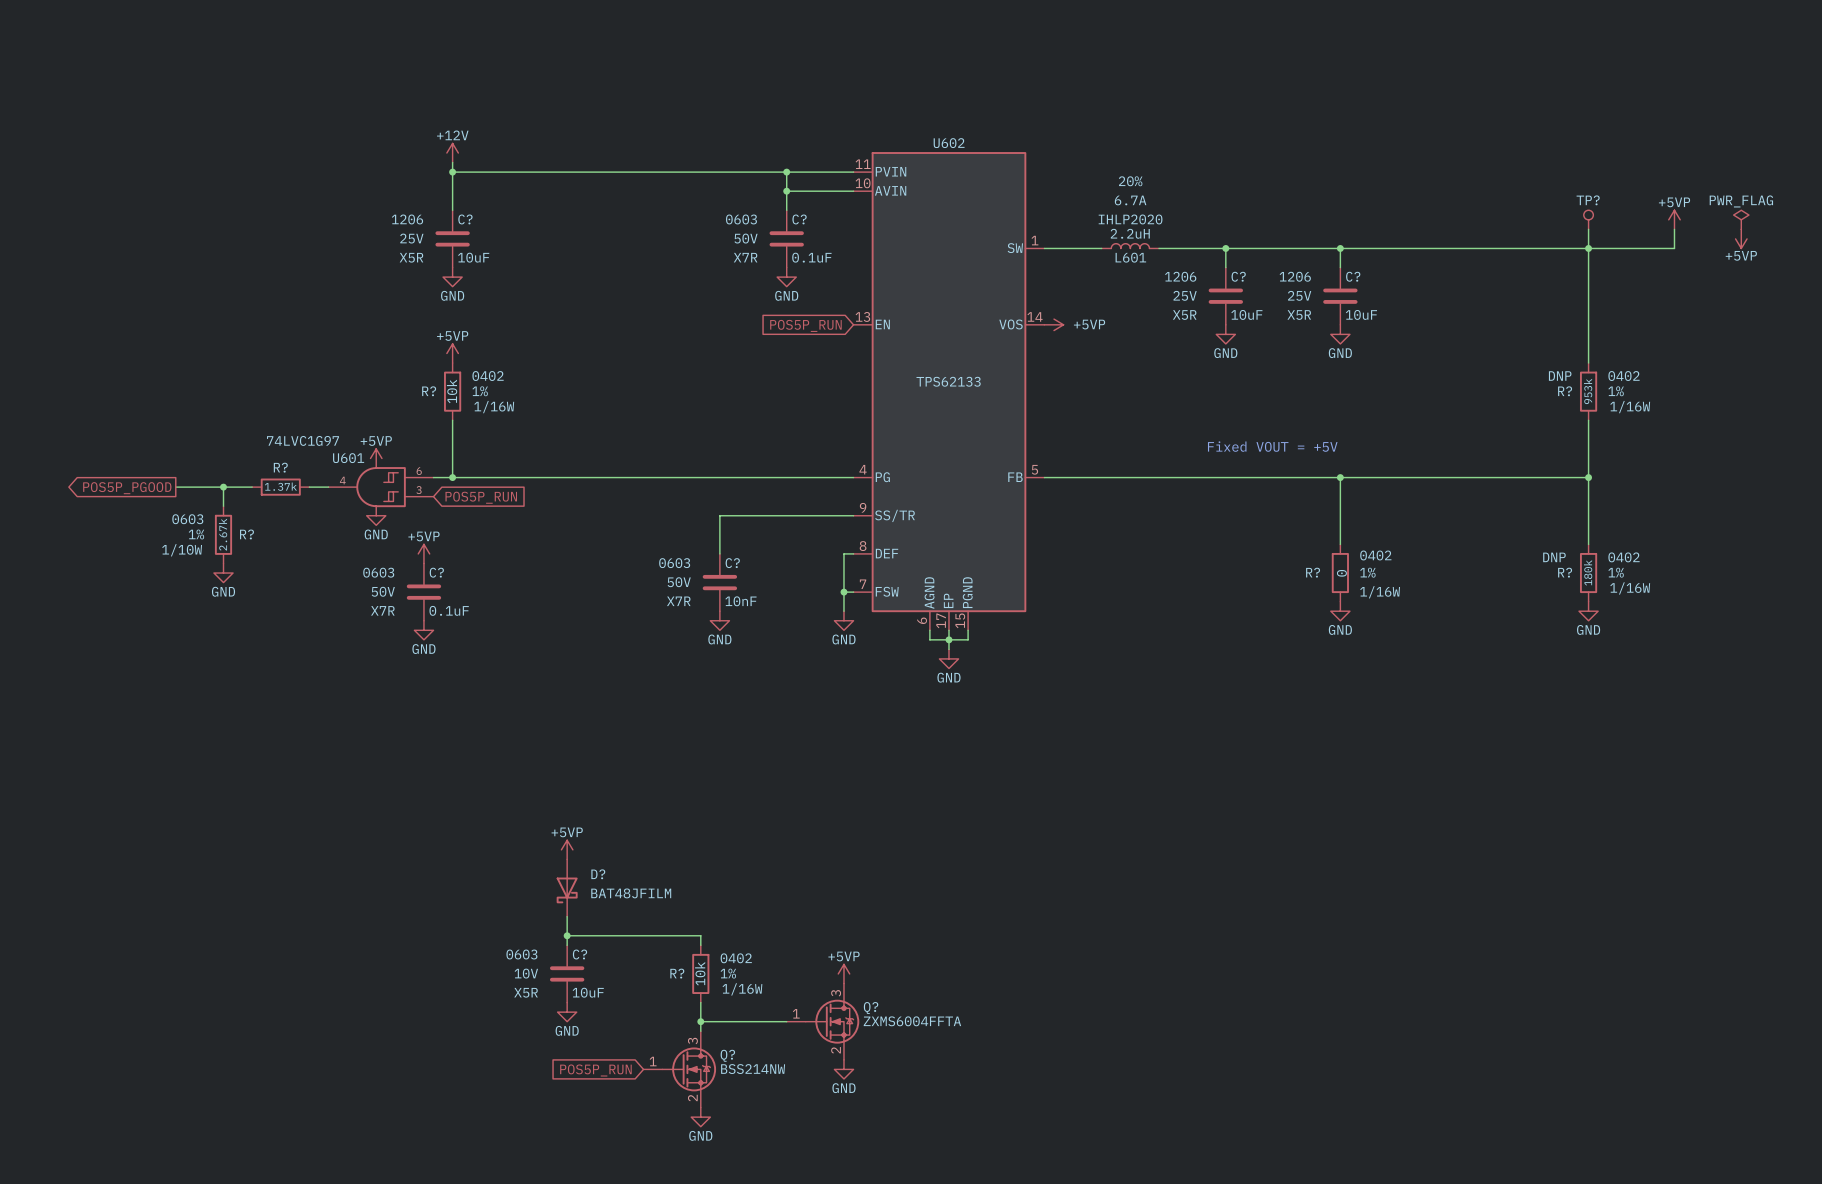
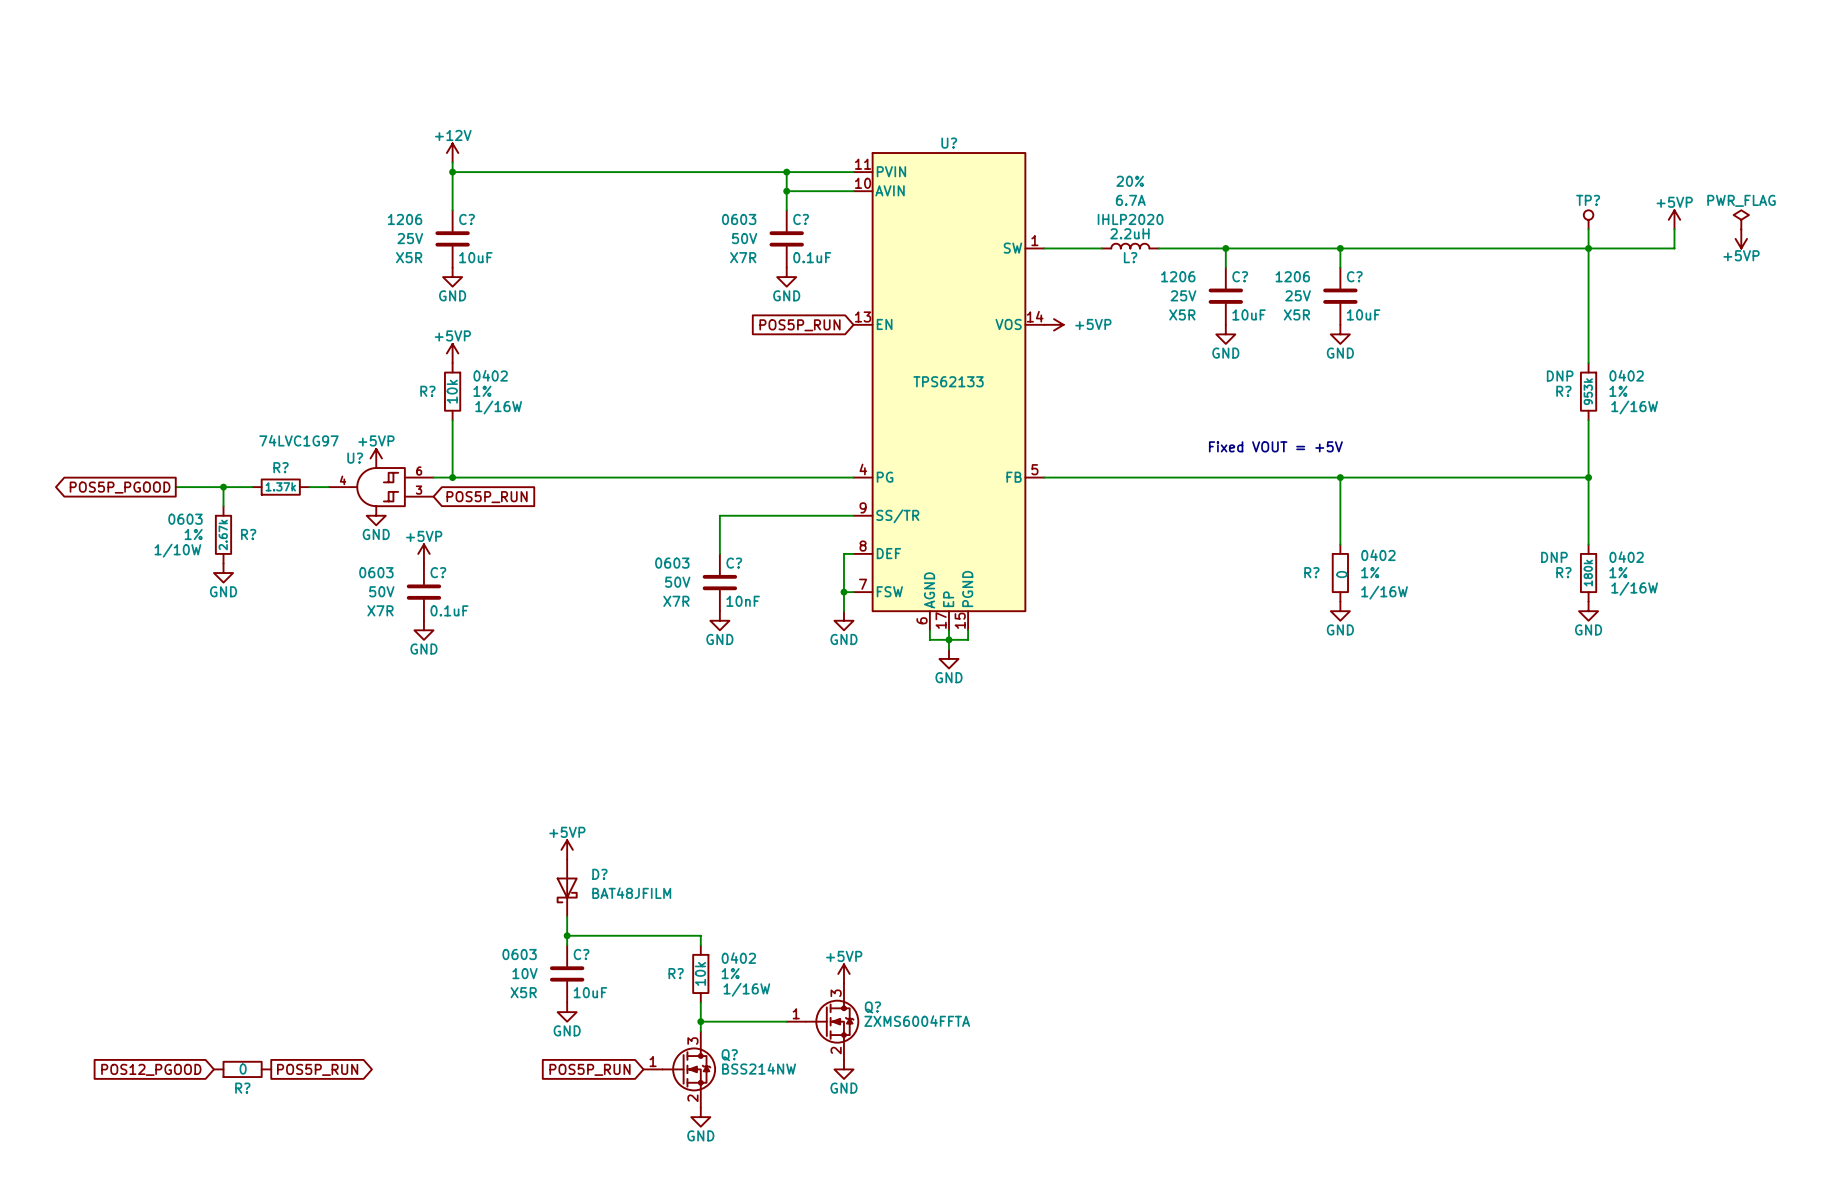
U602 name: U602 (949, 143) -> U? (949, 143)
L601 name: L601 (1130, 257) -> L? (1130, 257)
U601 name: U601 (348, 458) -> U? (355, 458)
R?: none -> 0 (242, 1069)
global label: none -> POS12_PGOOD (151, 1069)
global label: none -> POS5P_RUN (317, 1069)

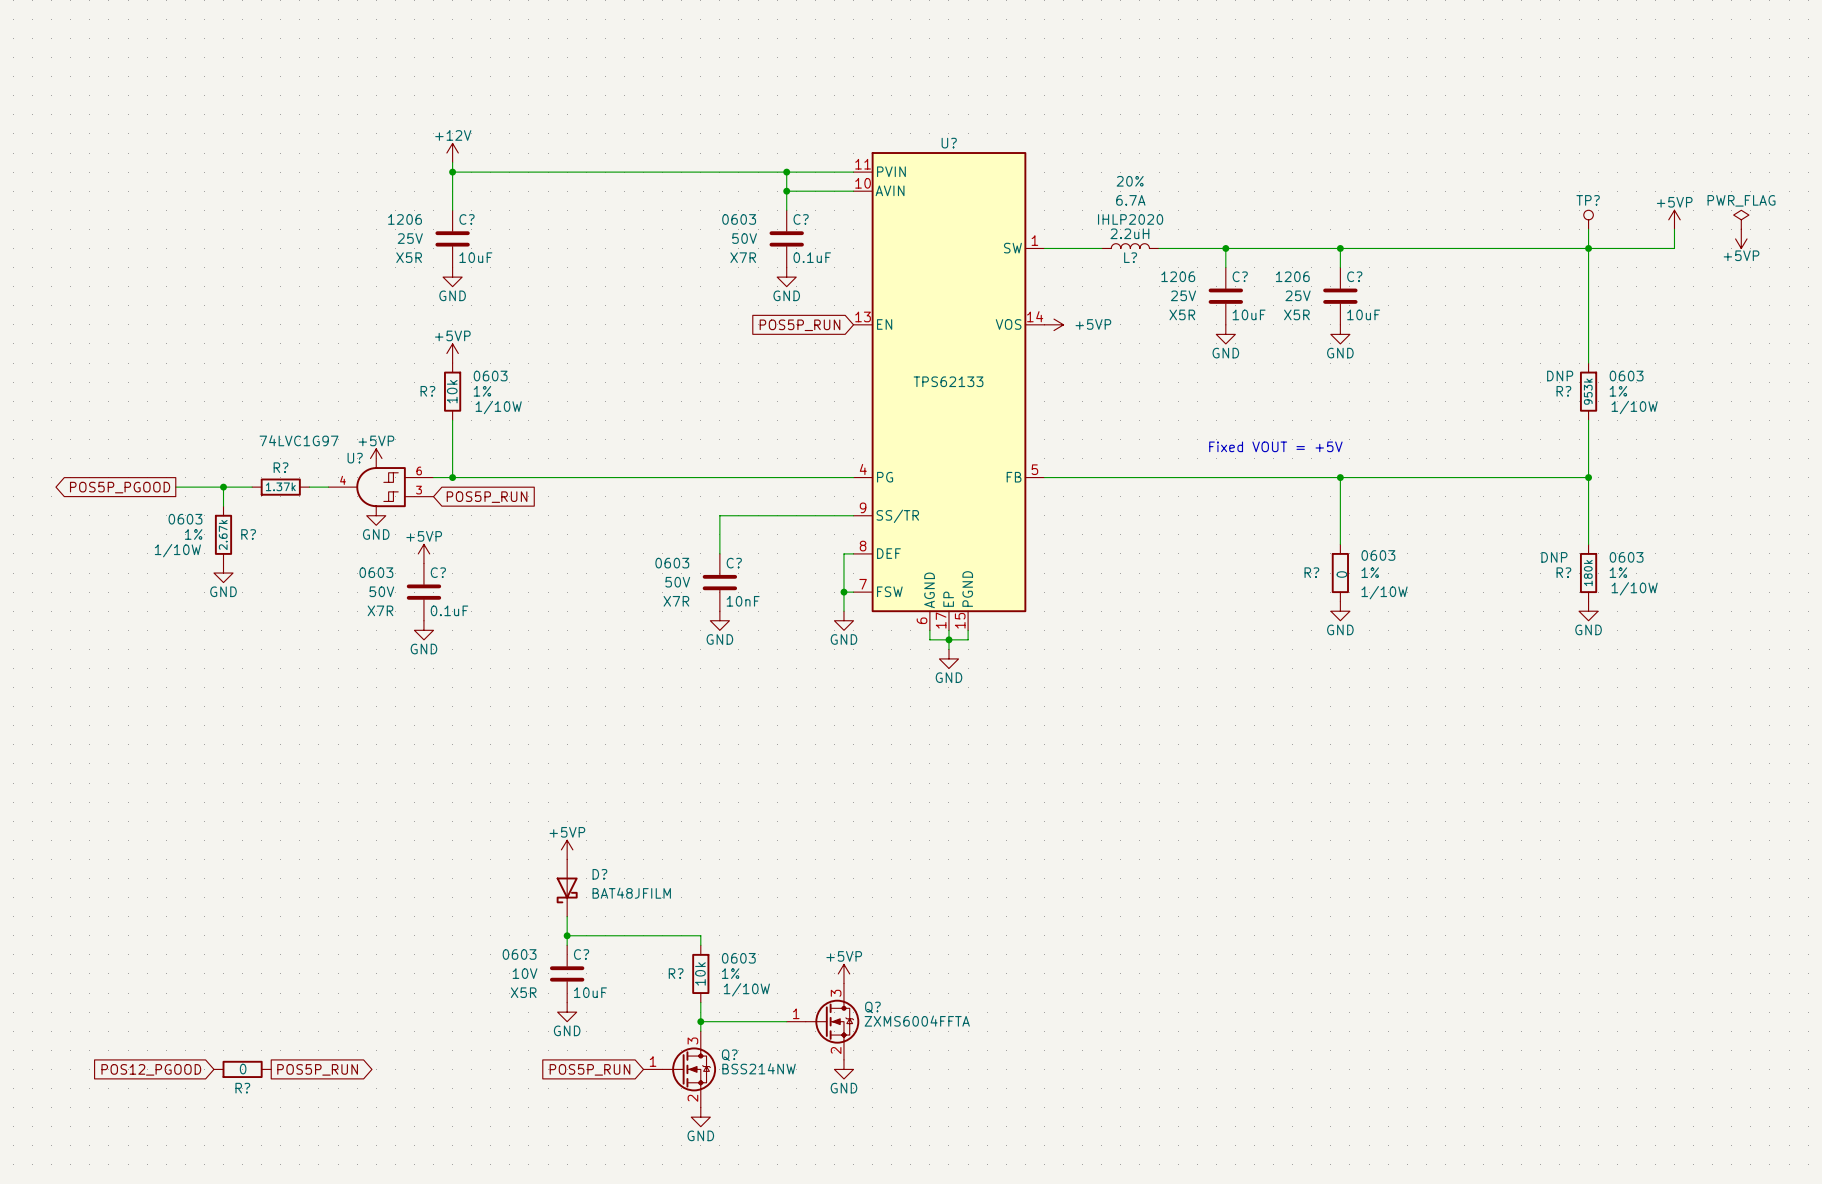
R? text: 0402 (490, 375) -> 0603 (490, 376)
R? text: 0402 (1626, 375) -> 0603 (1626, 376)
R? text: 1/16W (498, 407) -> 1/10W (498, 407)
R? text: 1/16W (1634, 407) -> 1/10W (1634, 407)
R? text: 0402 (1378, 555) -> 0603 (1378, 555)
R? text: 0402 (1626, 557) -> 0603 (1626, 557)
R? text: 1/16W (1634, 588) -> 1/10W (1634, 588)
R? text: 1/16W (1384, 592) -> 1/10W (1384, 592)
R? text: 0402 (738, 958) -> 0603 (738, 958)
R? text: 1/16W (746, 989) -> 1/10W (746, 989)

